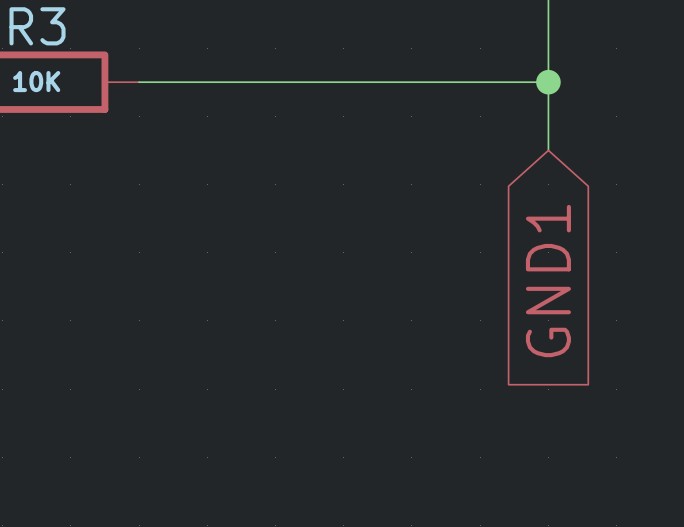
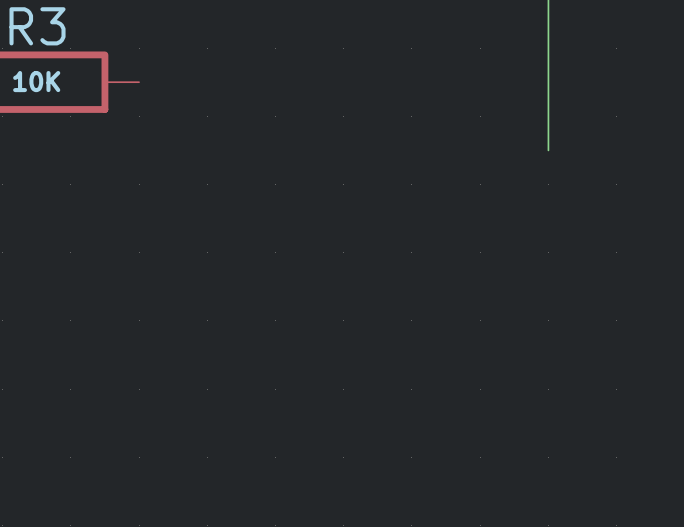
wire: (139, 82) (548, 82) -> none
junction: (548, 82) -> none
global label: GND1 (548, 281) -> none

